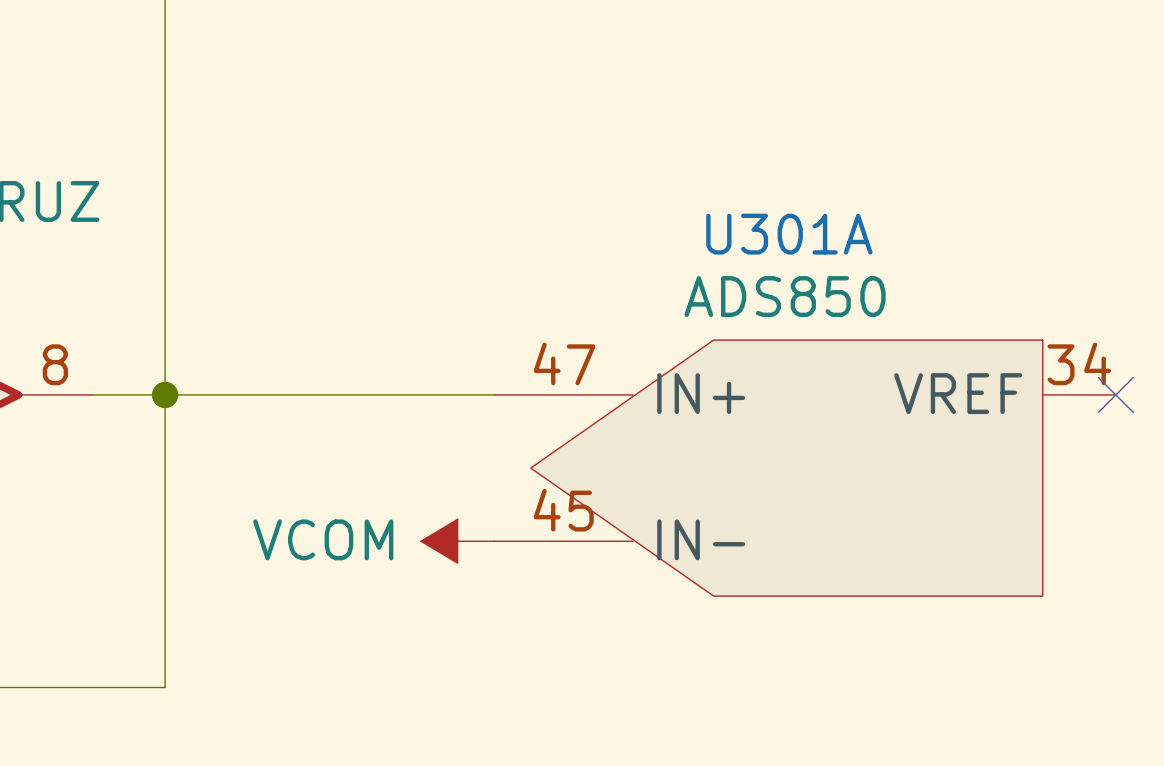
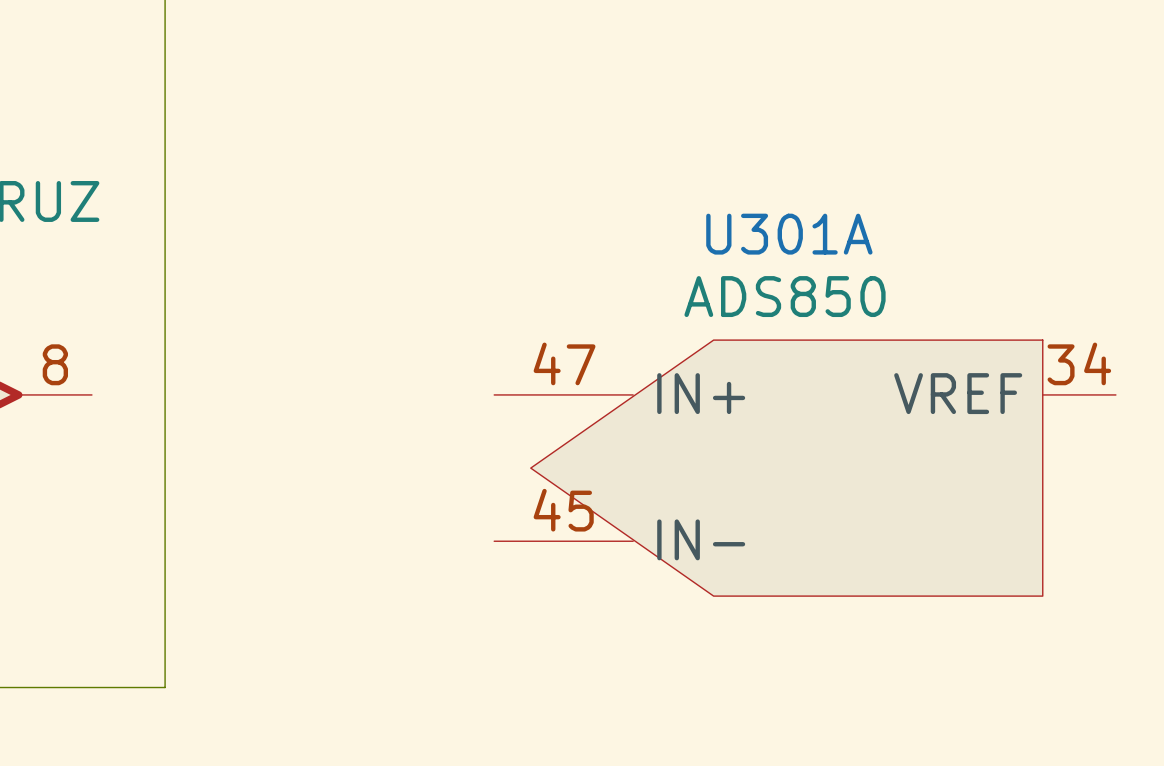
wire: (91, 394) (494, 394) -> none
junction: (165, 394) -> none
no-connect mark: (1115, 394) -> none
power symbol: VCOM (457, 541) -> none

